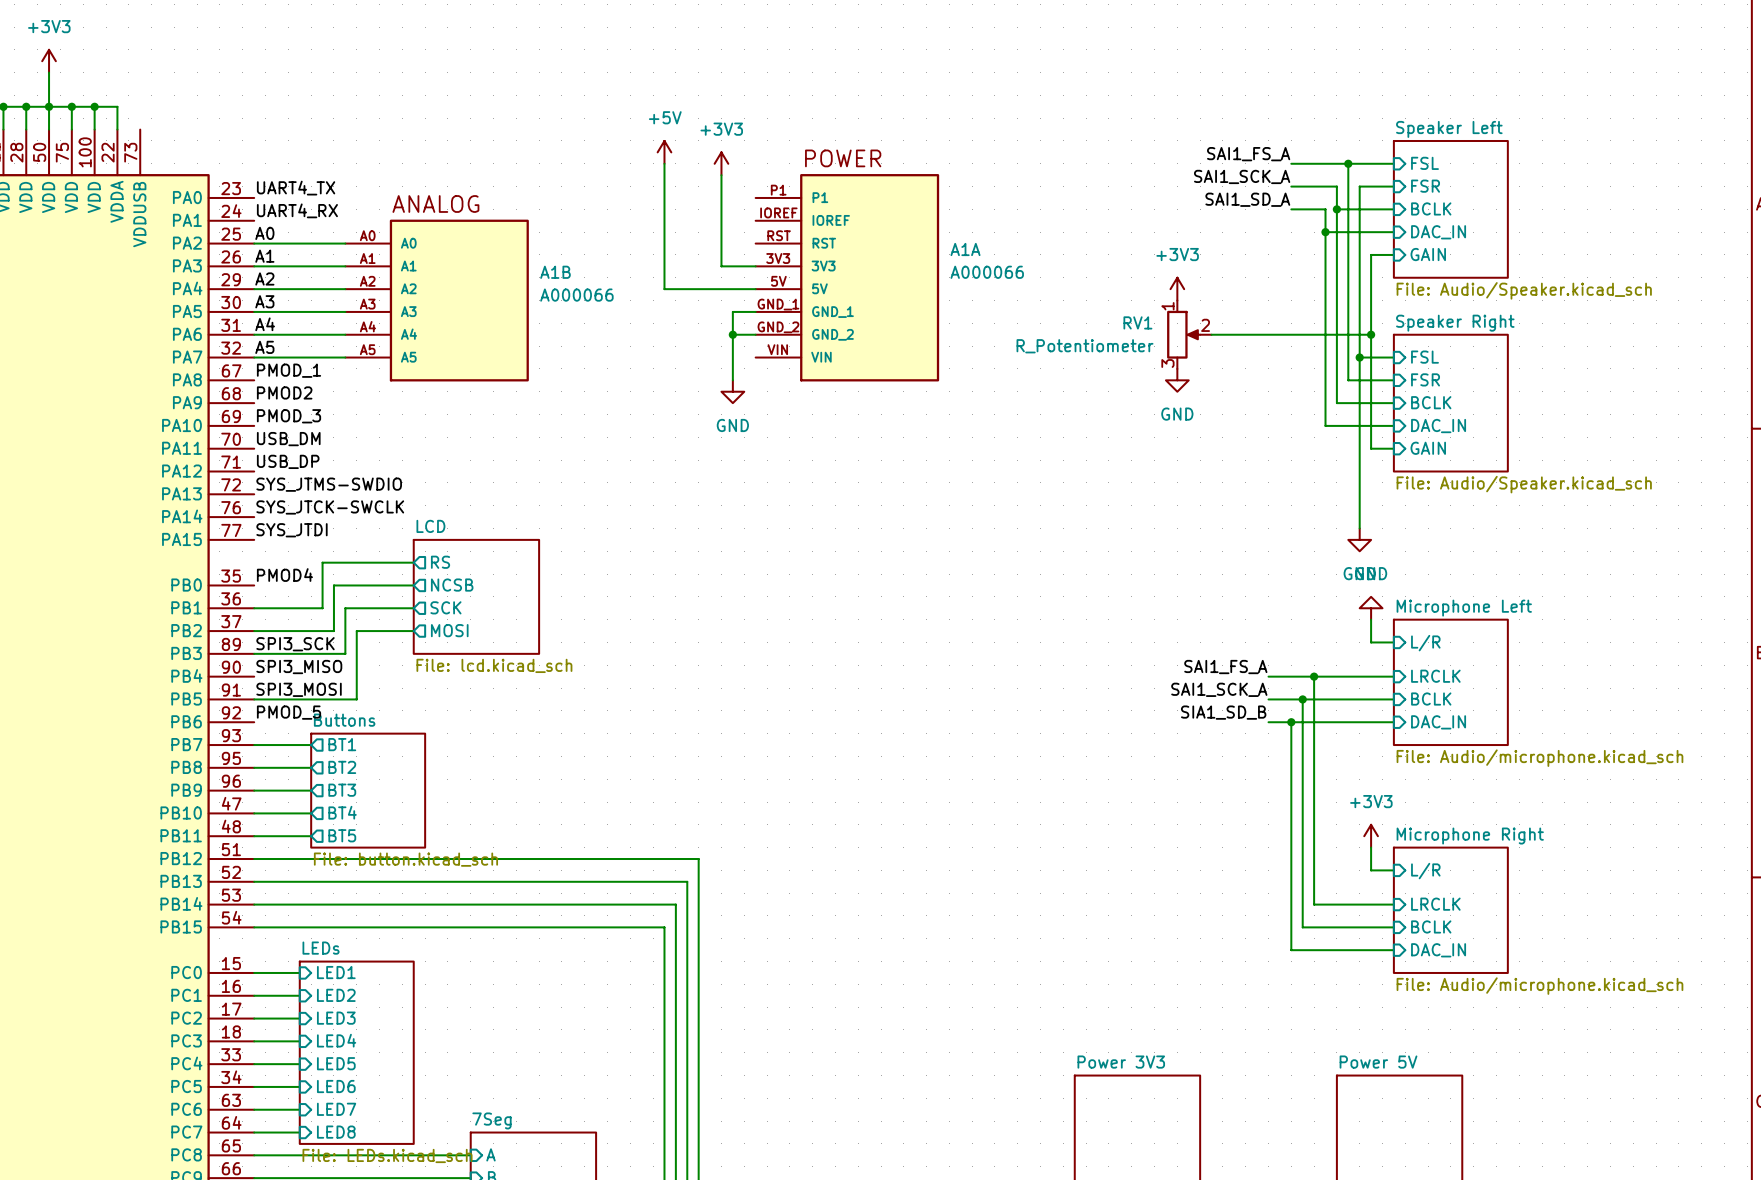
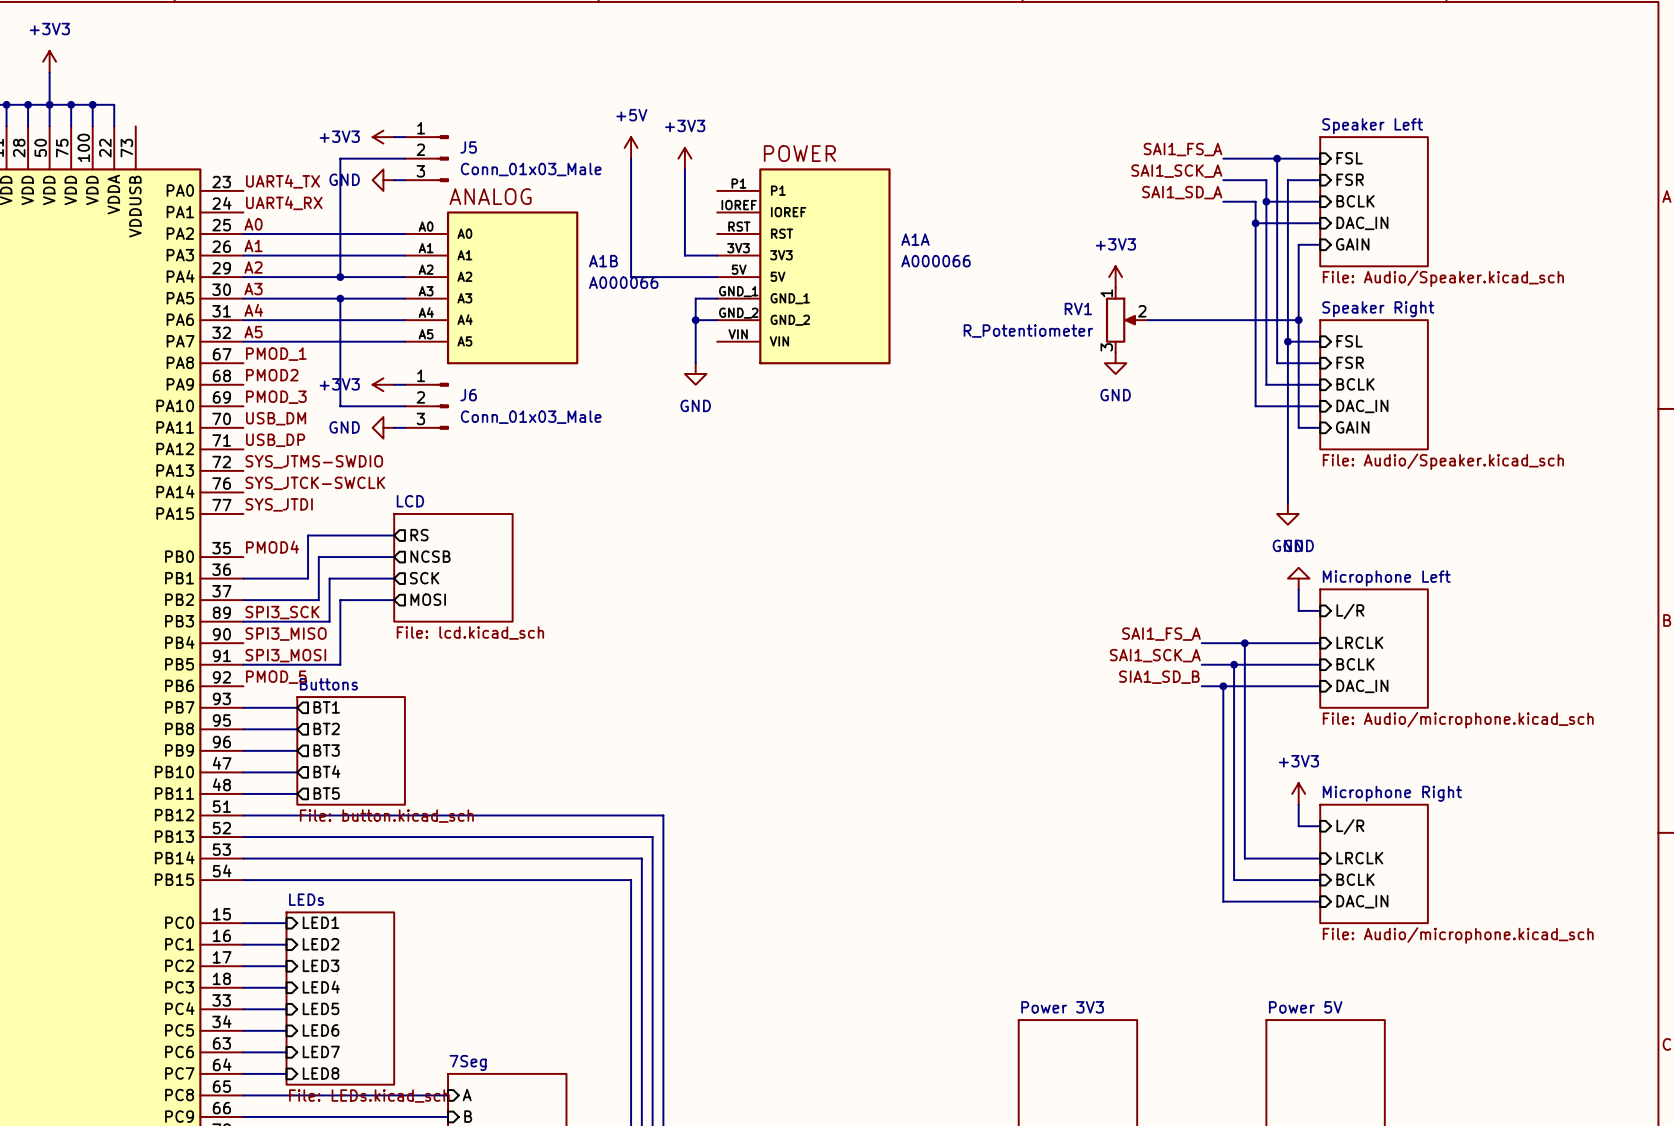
power symbol: none -> +3V3 (383, 137)
wire: none -> (394, 137) (404, 137)
wire: none -> (404, 158) (340, 158) (340, 277)
J5: none -> Conn_01x03_Male (426, 158)
power symbol: none -> GND (383, 180)
wire: none -> (394, 180) (404, 180)
junction: none -> (340, 277)
A1B position: (437, 300) -> (491, 287)
wire: none -> (340, 298) (340, 406) (404, 406)
junction: none -> (340, 298)
power symbol: none -> +3V3 (383, 384)
wire: none -> (394, 384) (404, 384)
J6: none -> Conn_01x03_Male (426, 406)
power symbol: none -> GND (383, 427)
wire: none -> (394, 427) (404, 427)

